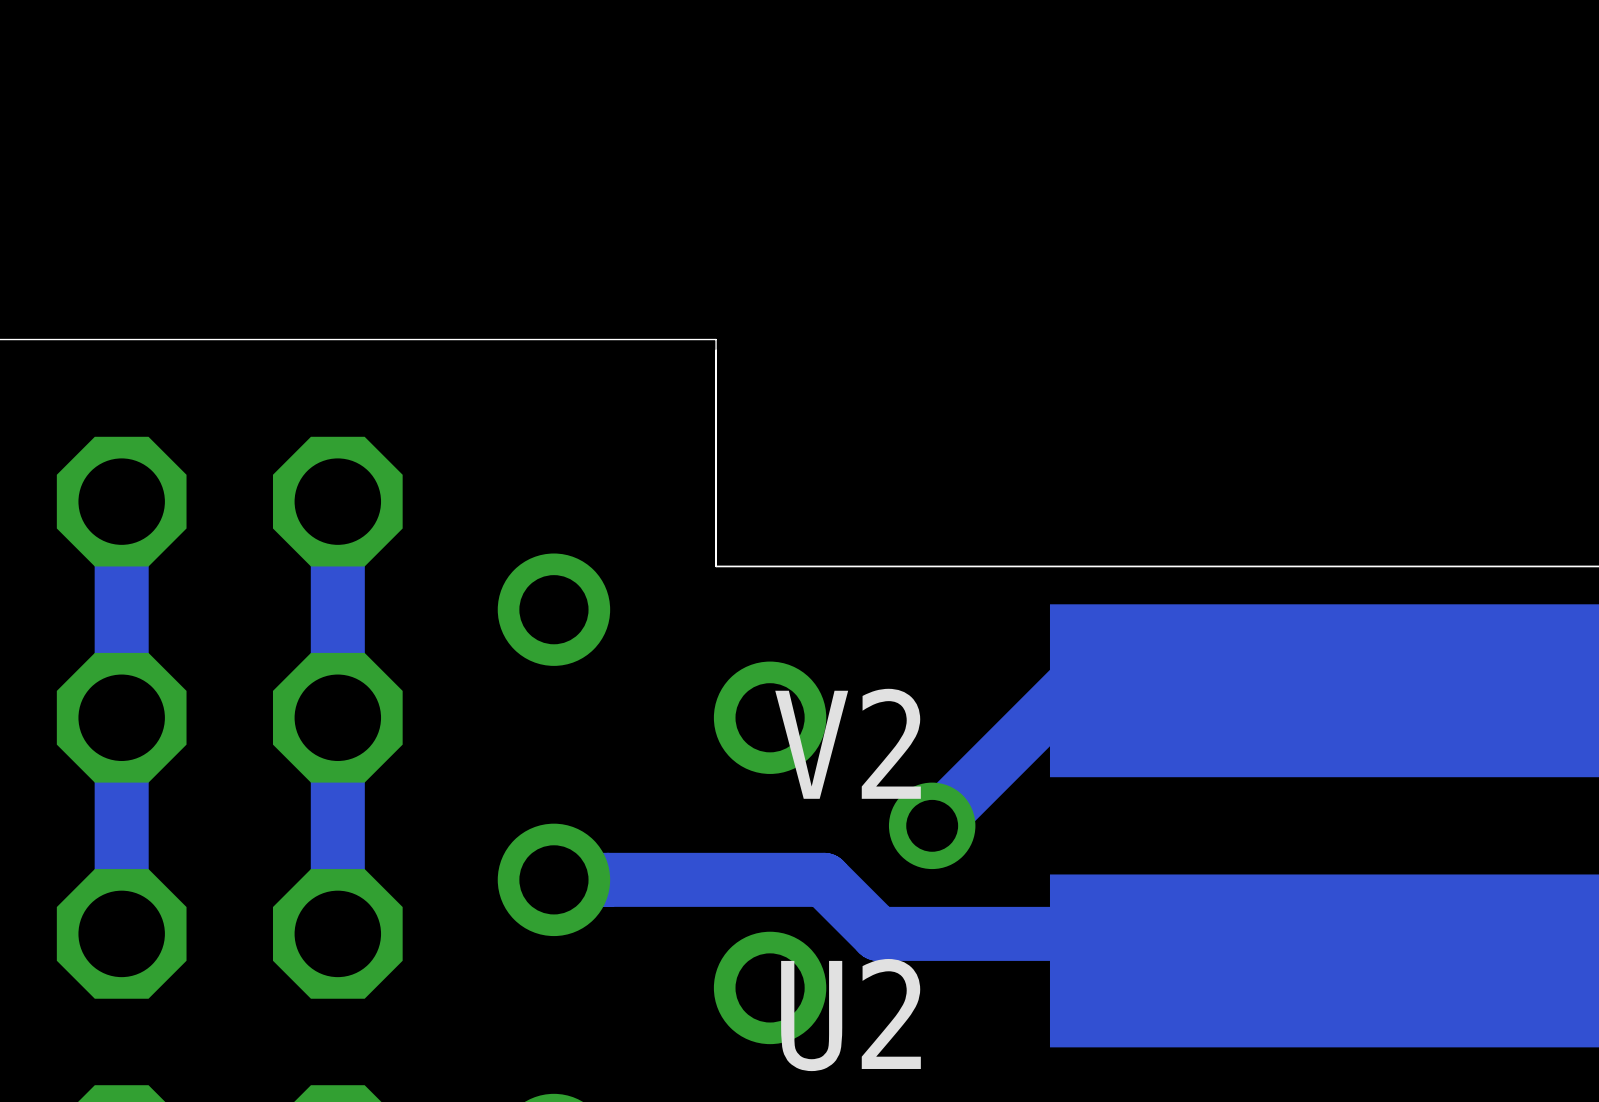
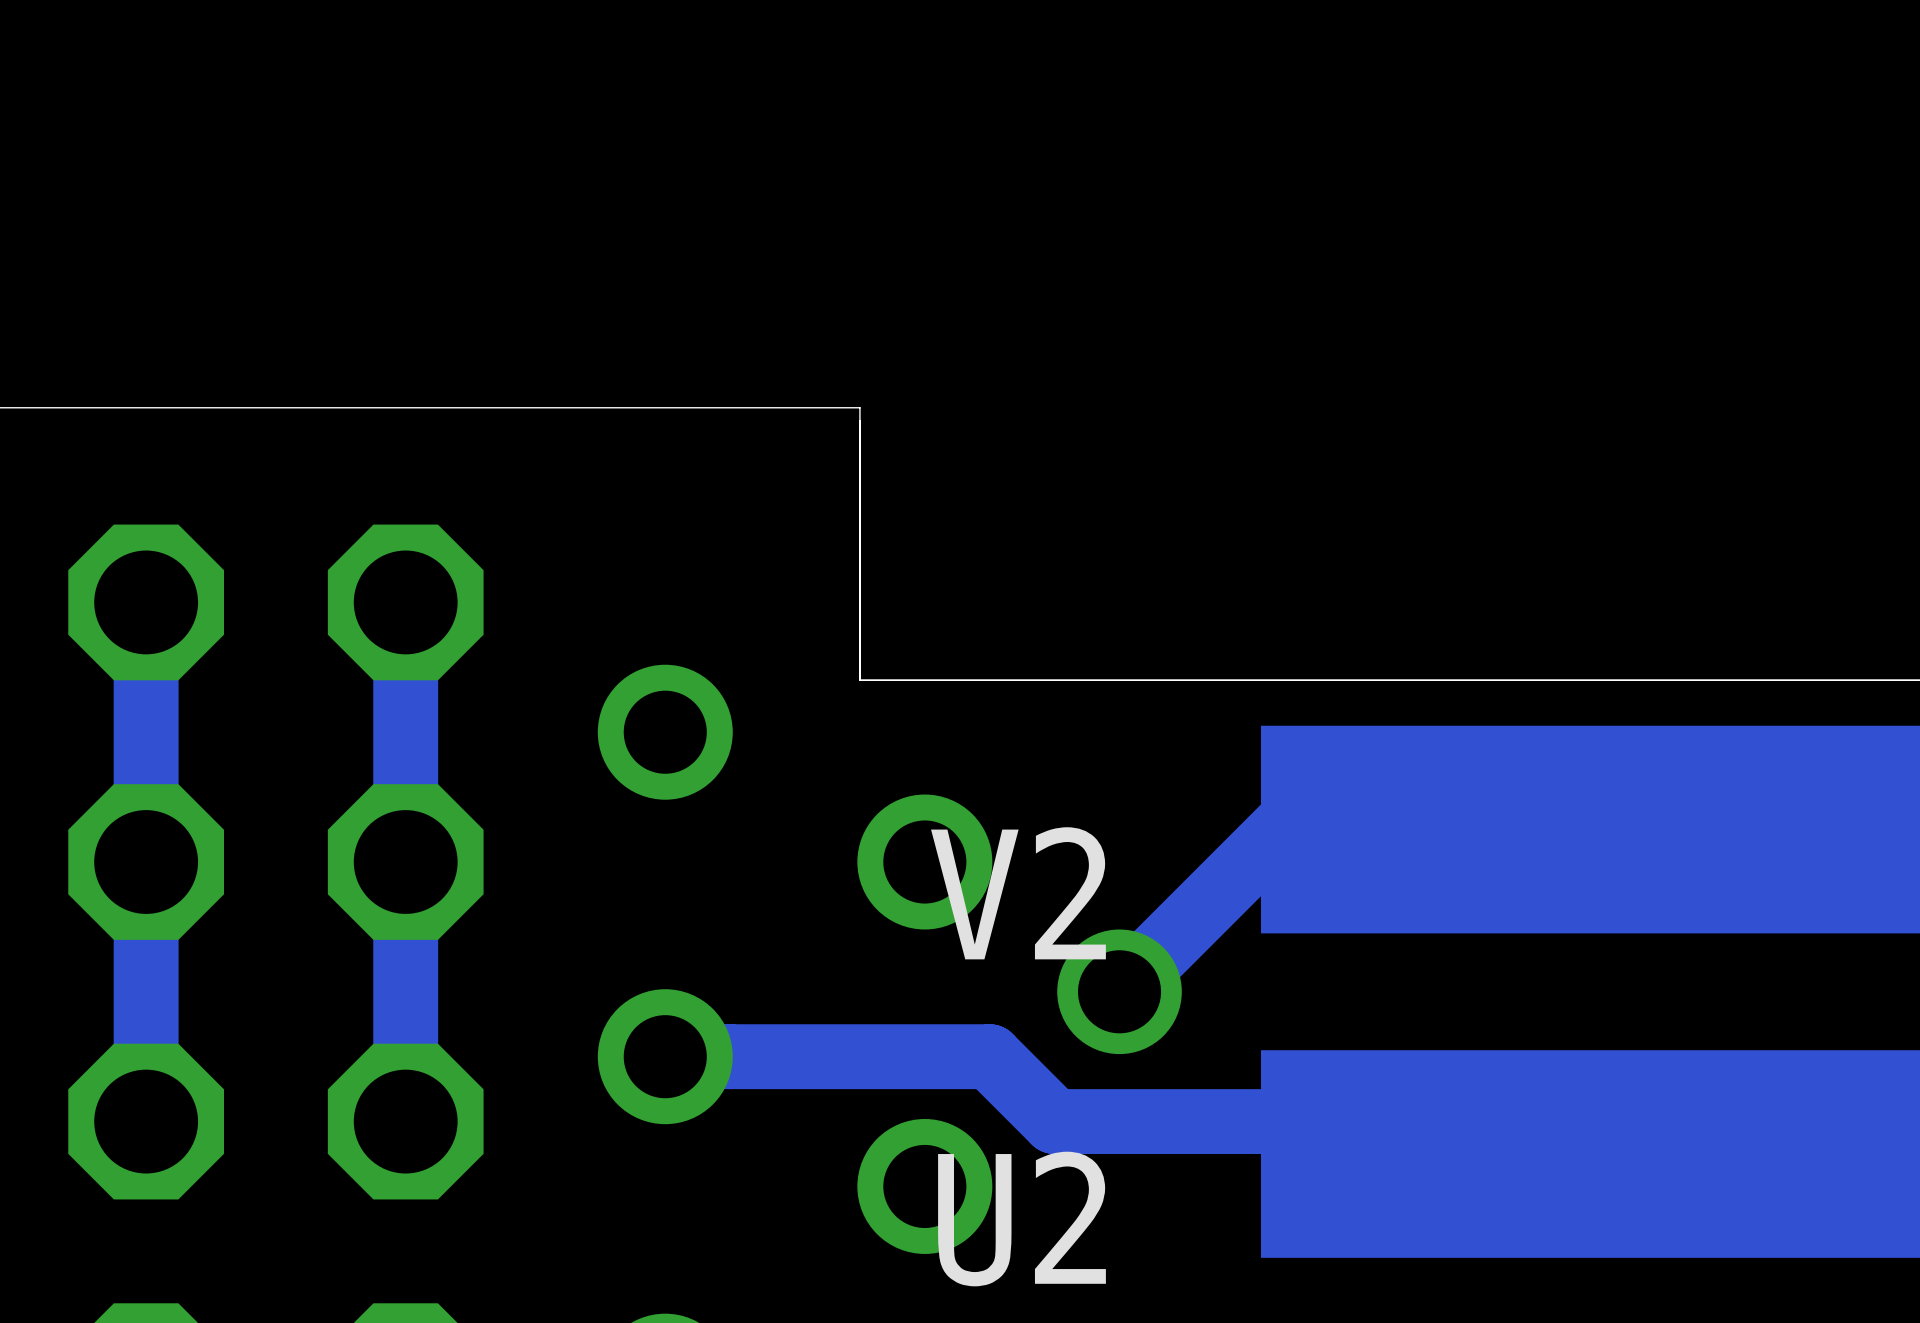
via size: [888, 782, 976, 870] -> [1057, 929, 1182, 1055]

